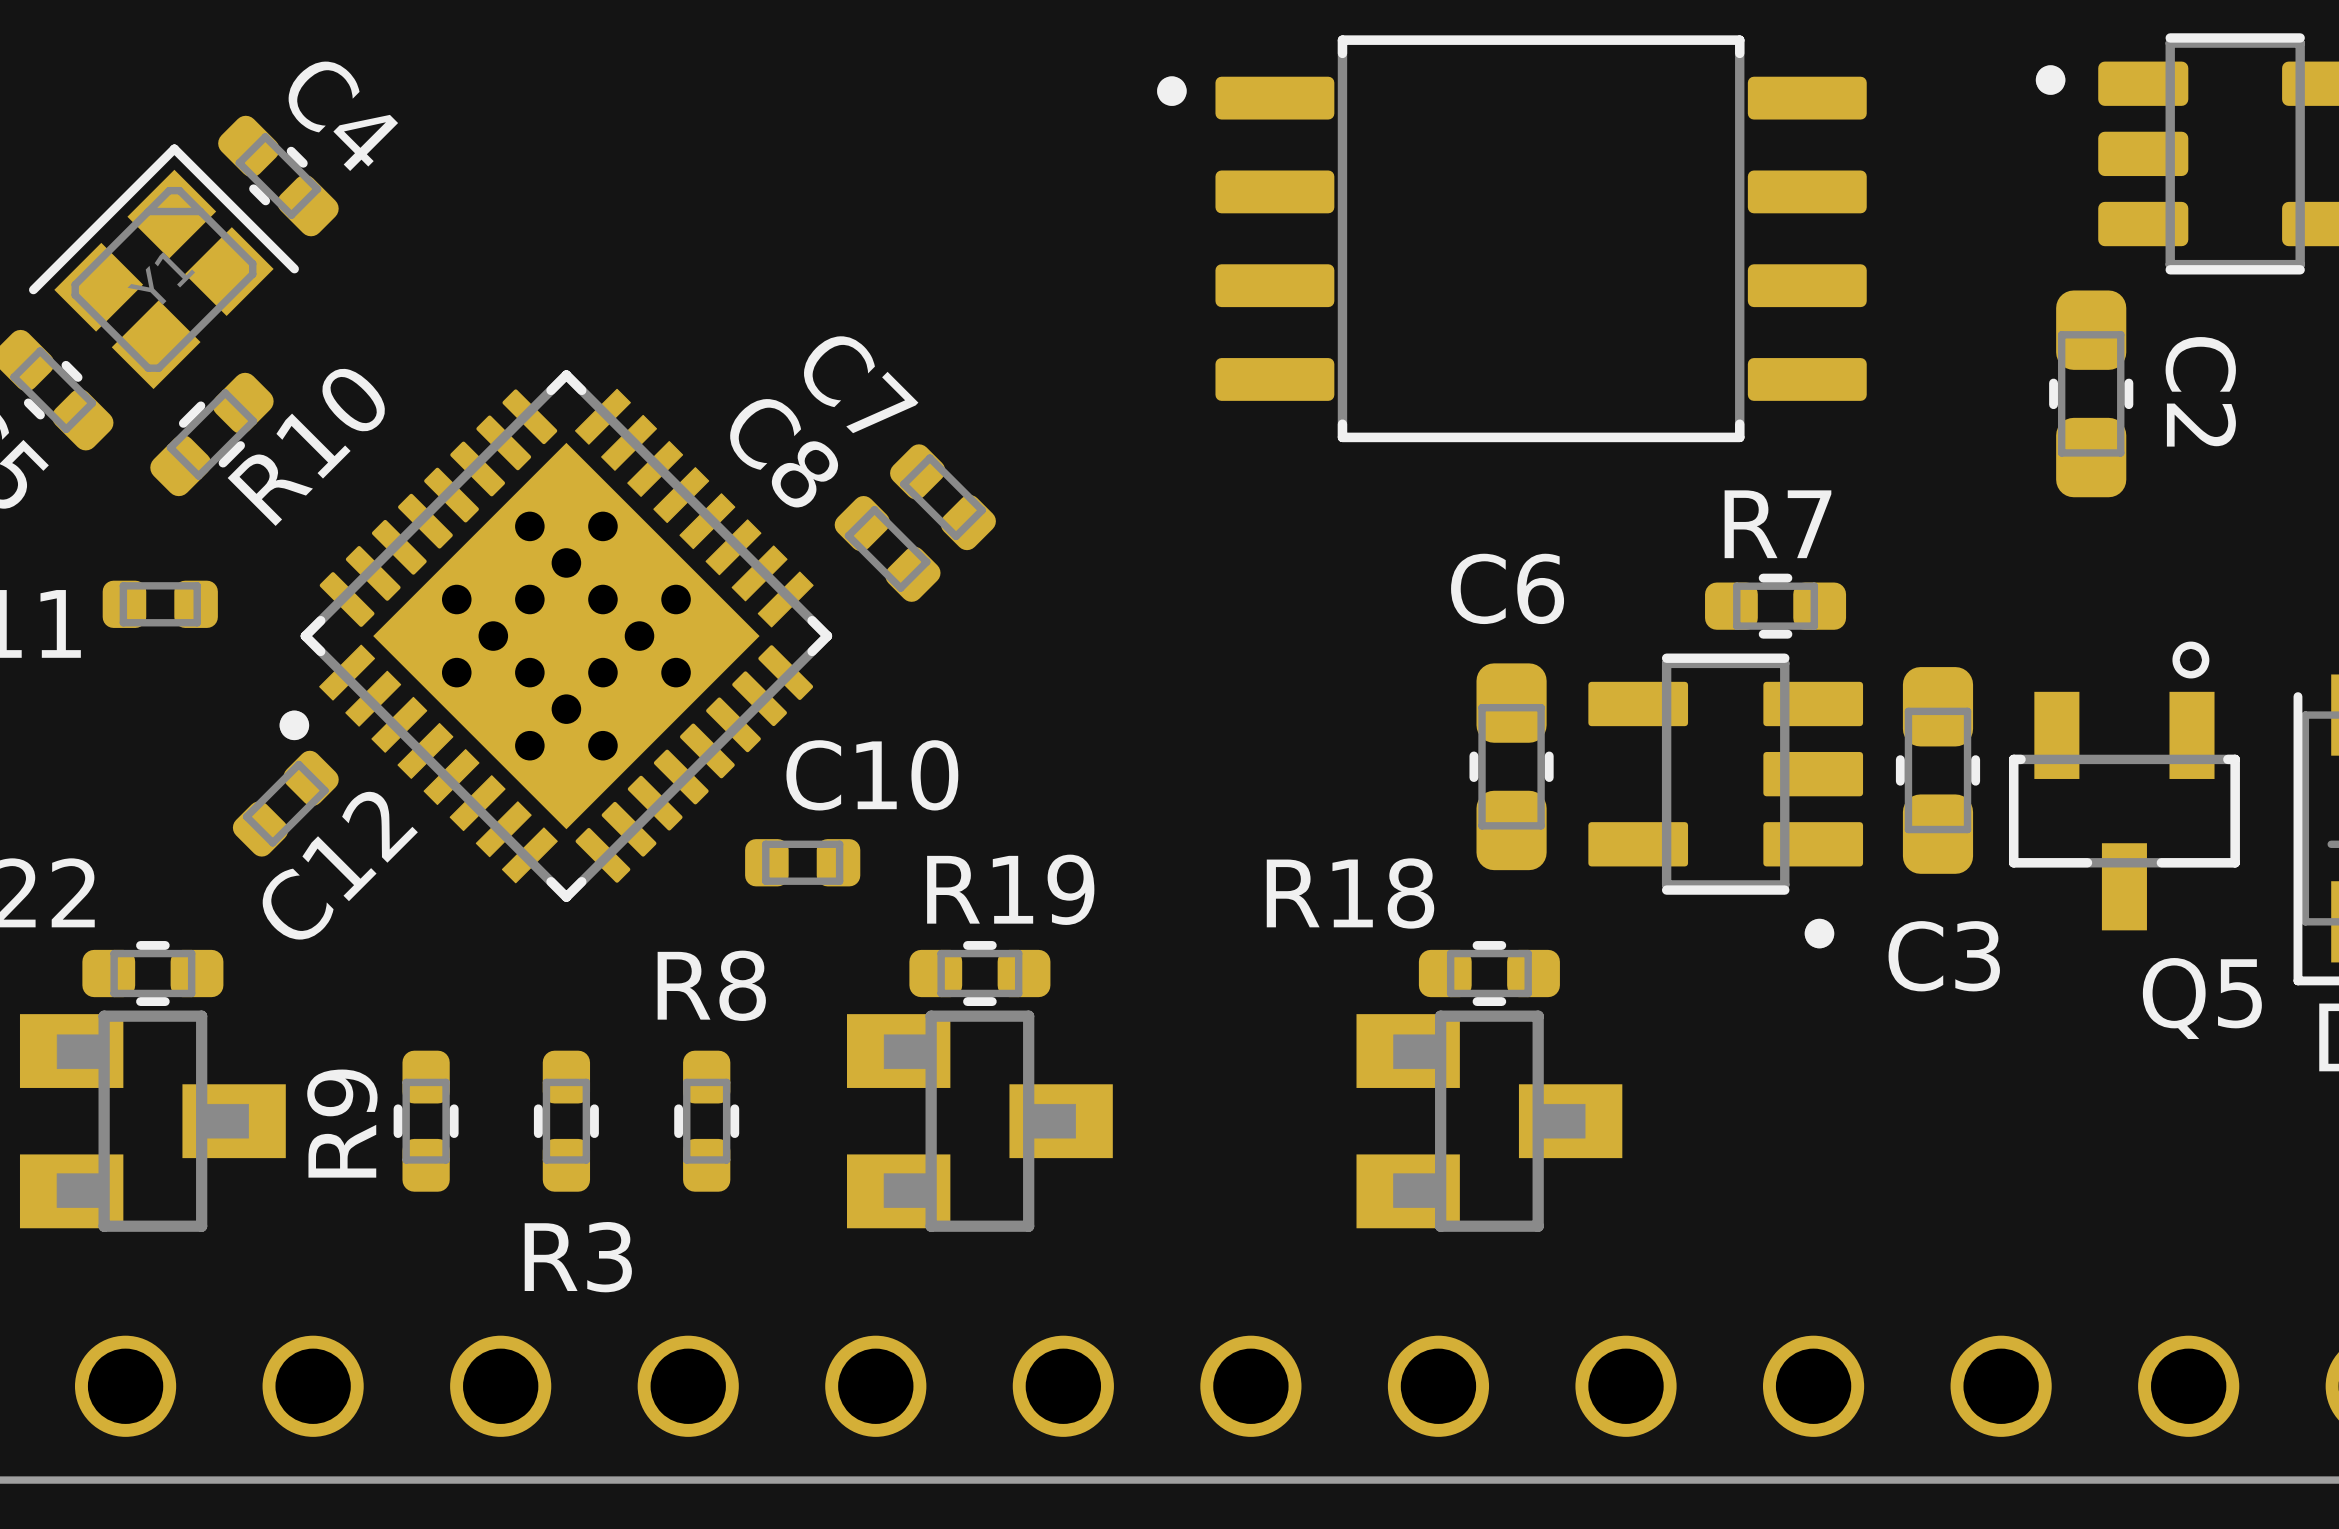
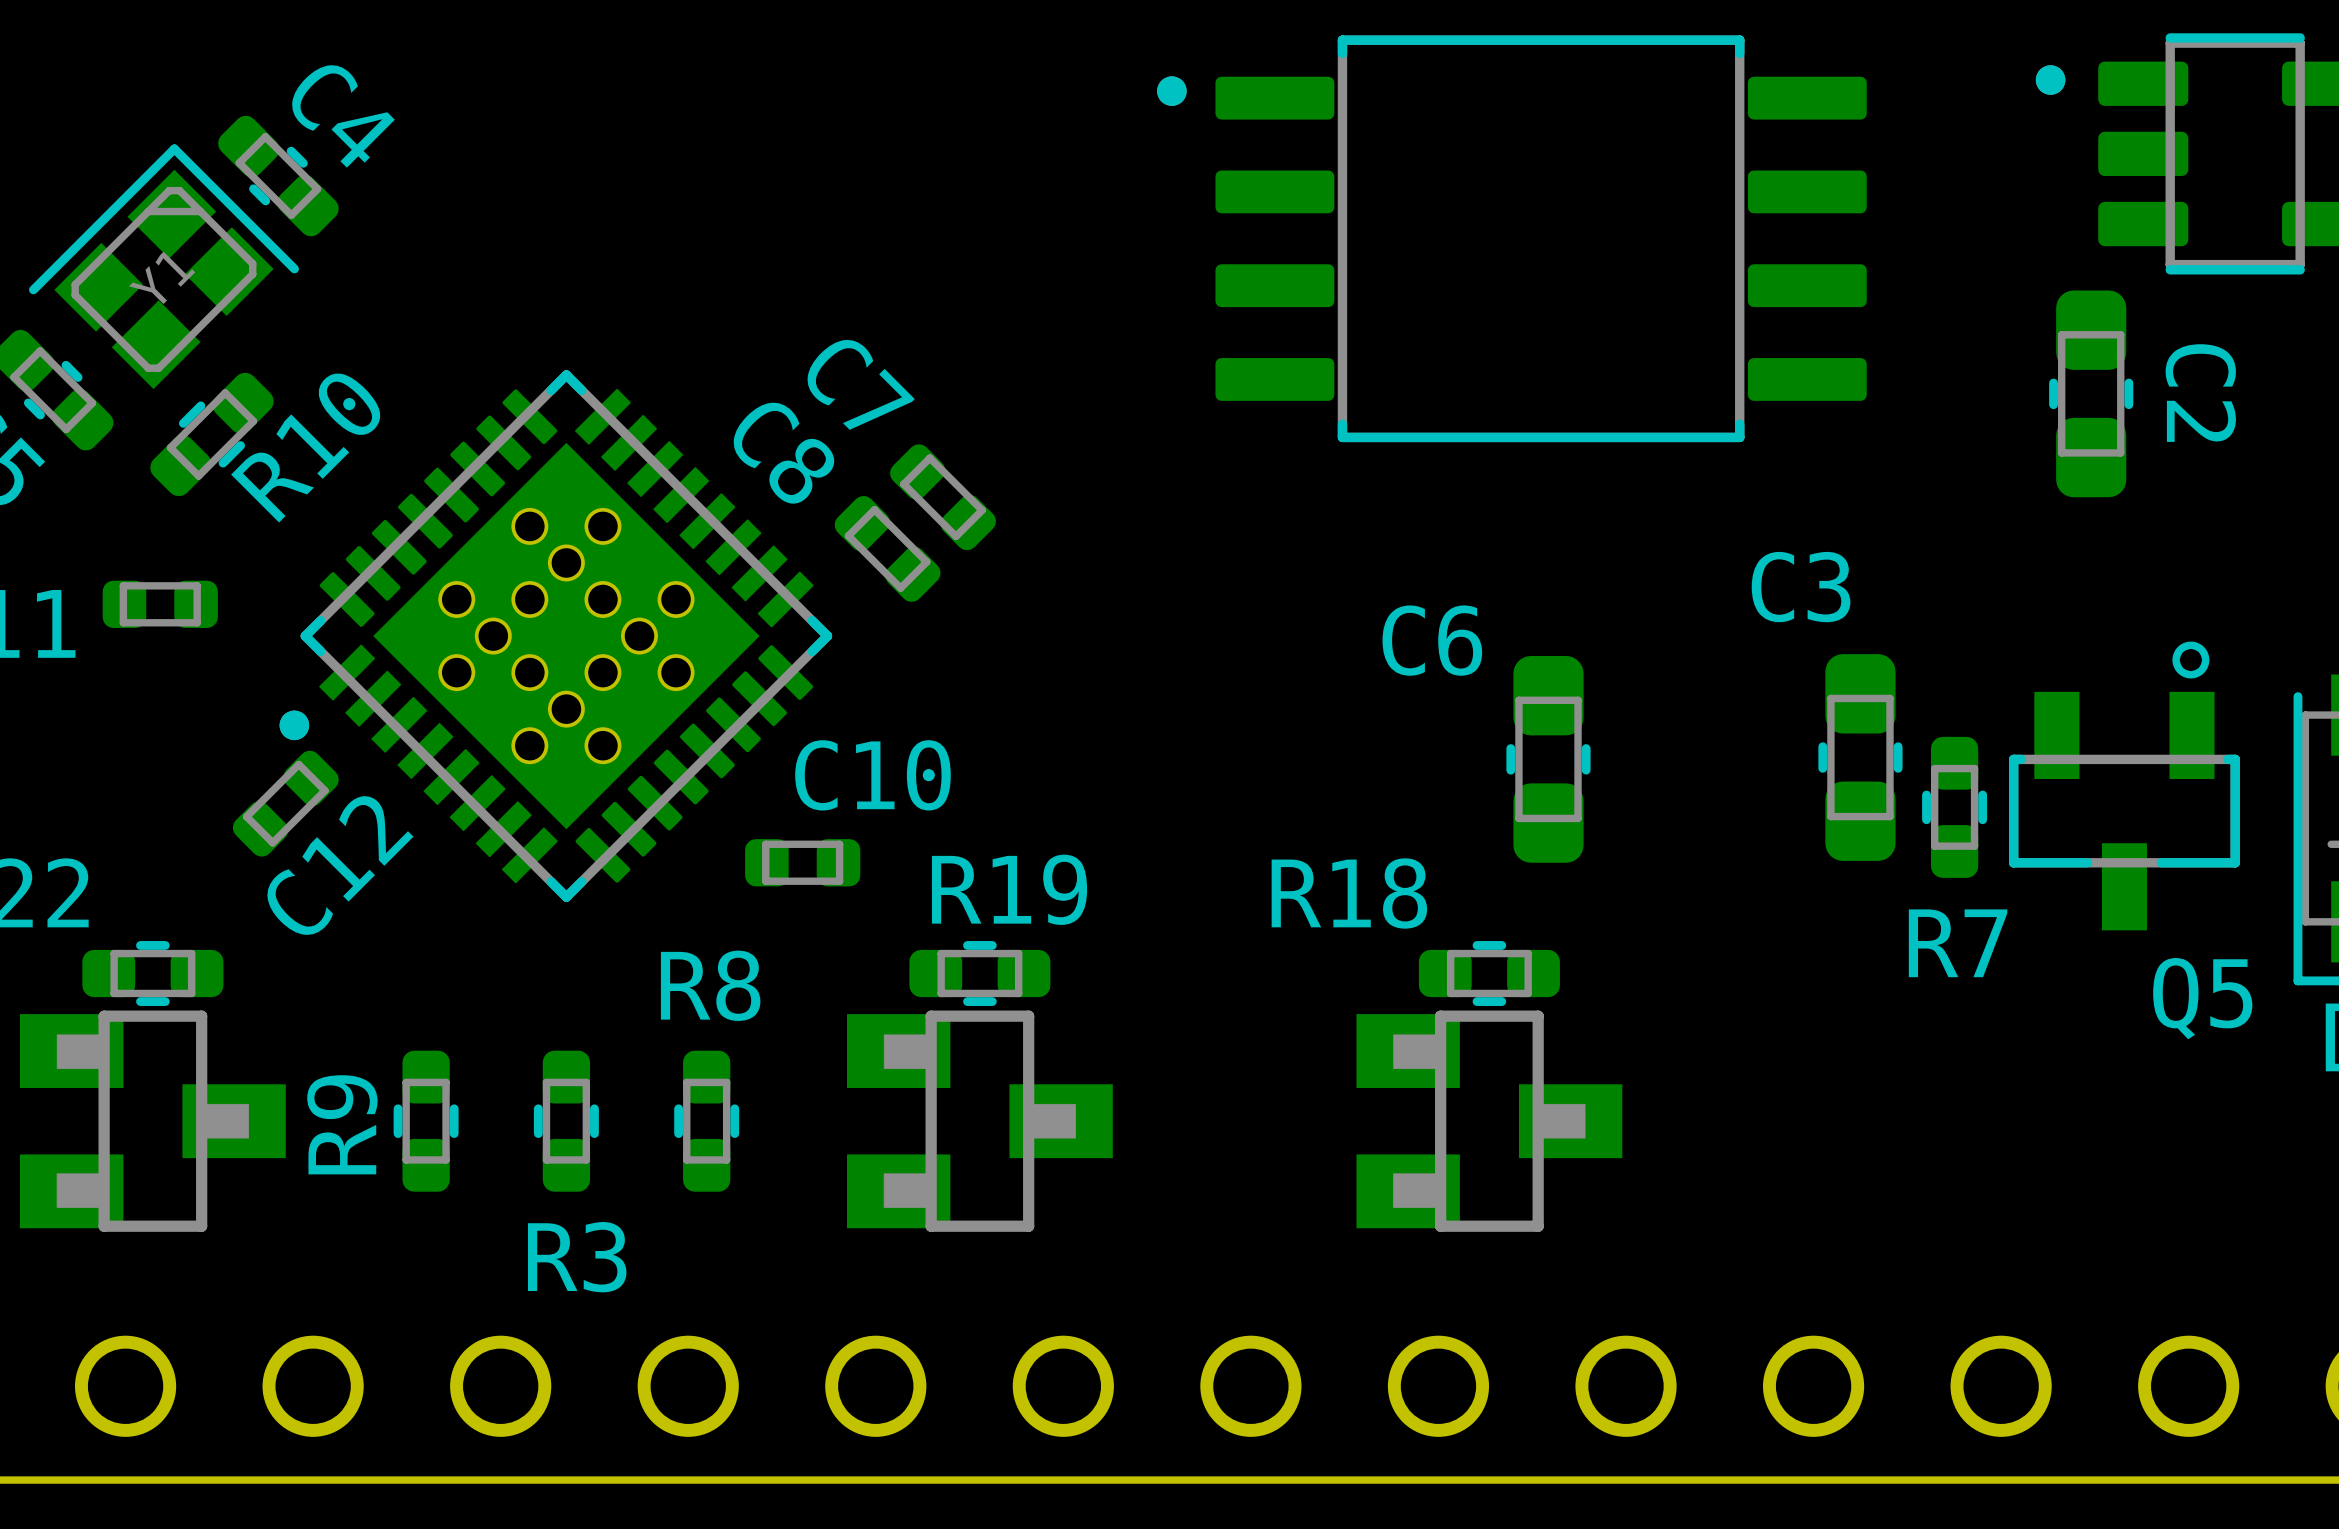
R7 name position: R7 (1777, 524) -> R7 (1958, 943)
C6 name position: C6 (1507, 588) -> C6 (1432, 640)
R7 rotation: 0° (1775, 606) -> 90° clockwise (1954, 807)
R7 position: (1775, 606) -> (1954, 807)
C6 position: (1511, 766) -> (1548, 759)
C3 position: (1937, 770) -> (1860, 757)
part: (1725, 800) -> none
C3 name position: C3 (1944, 956) -> C3 (1801, 587)

